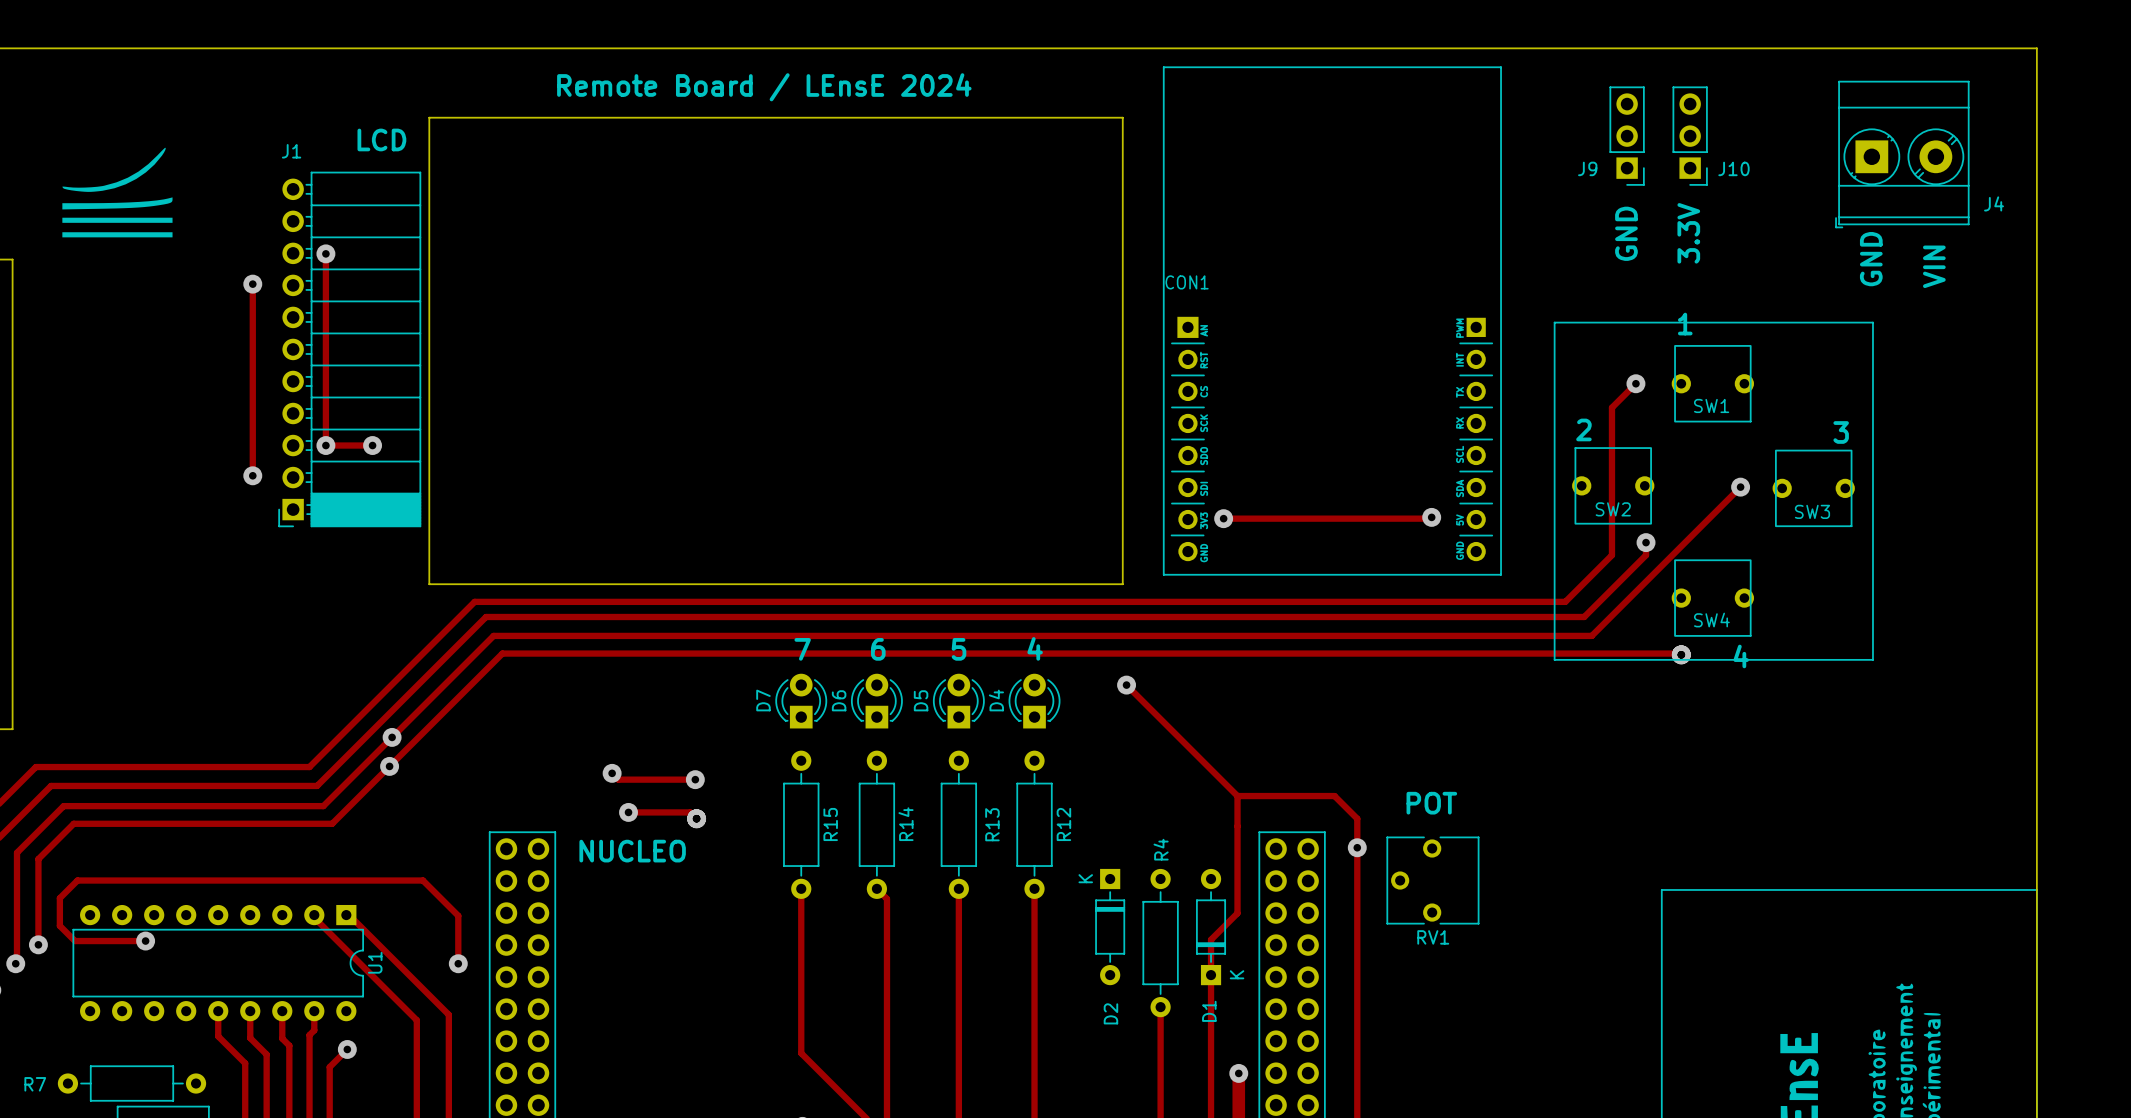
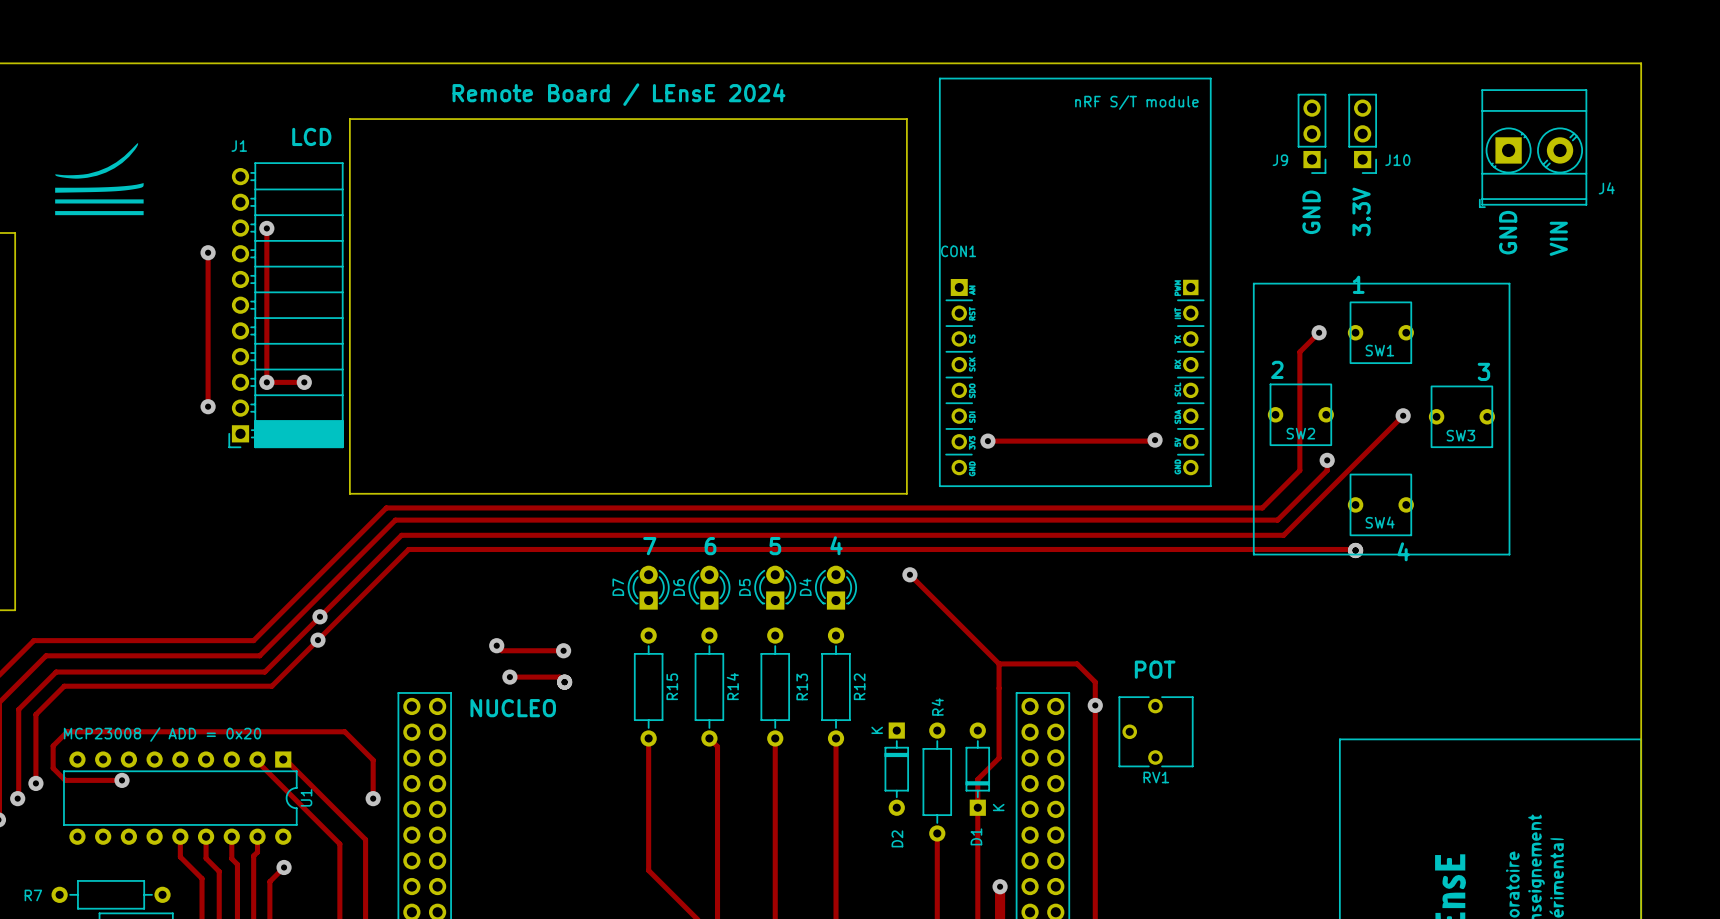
text: none -> nRF S/T module (1136, 102)
text: none -> MCP23008 / ADD = 0x20 (162, 734)

